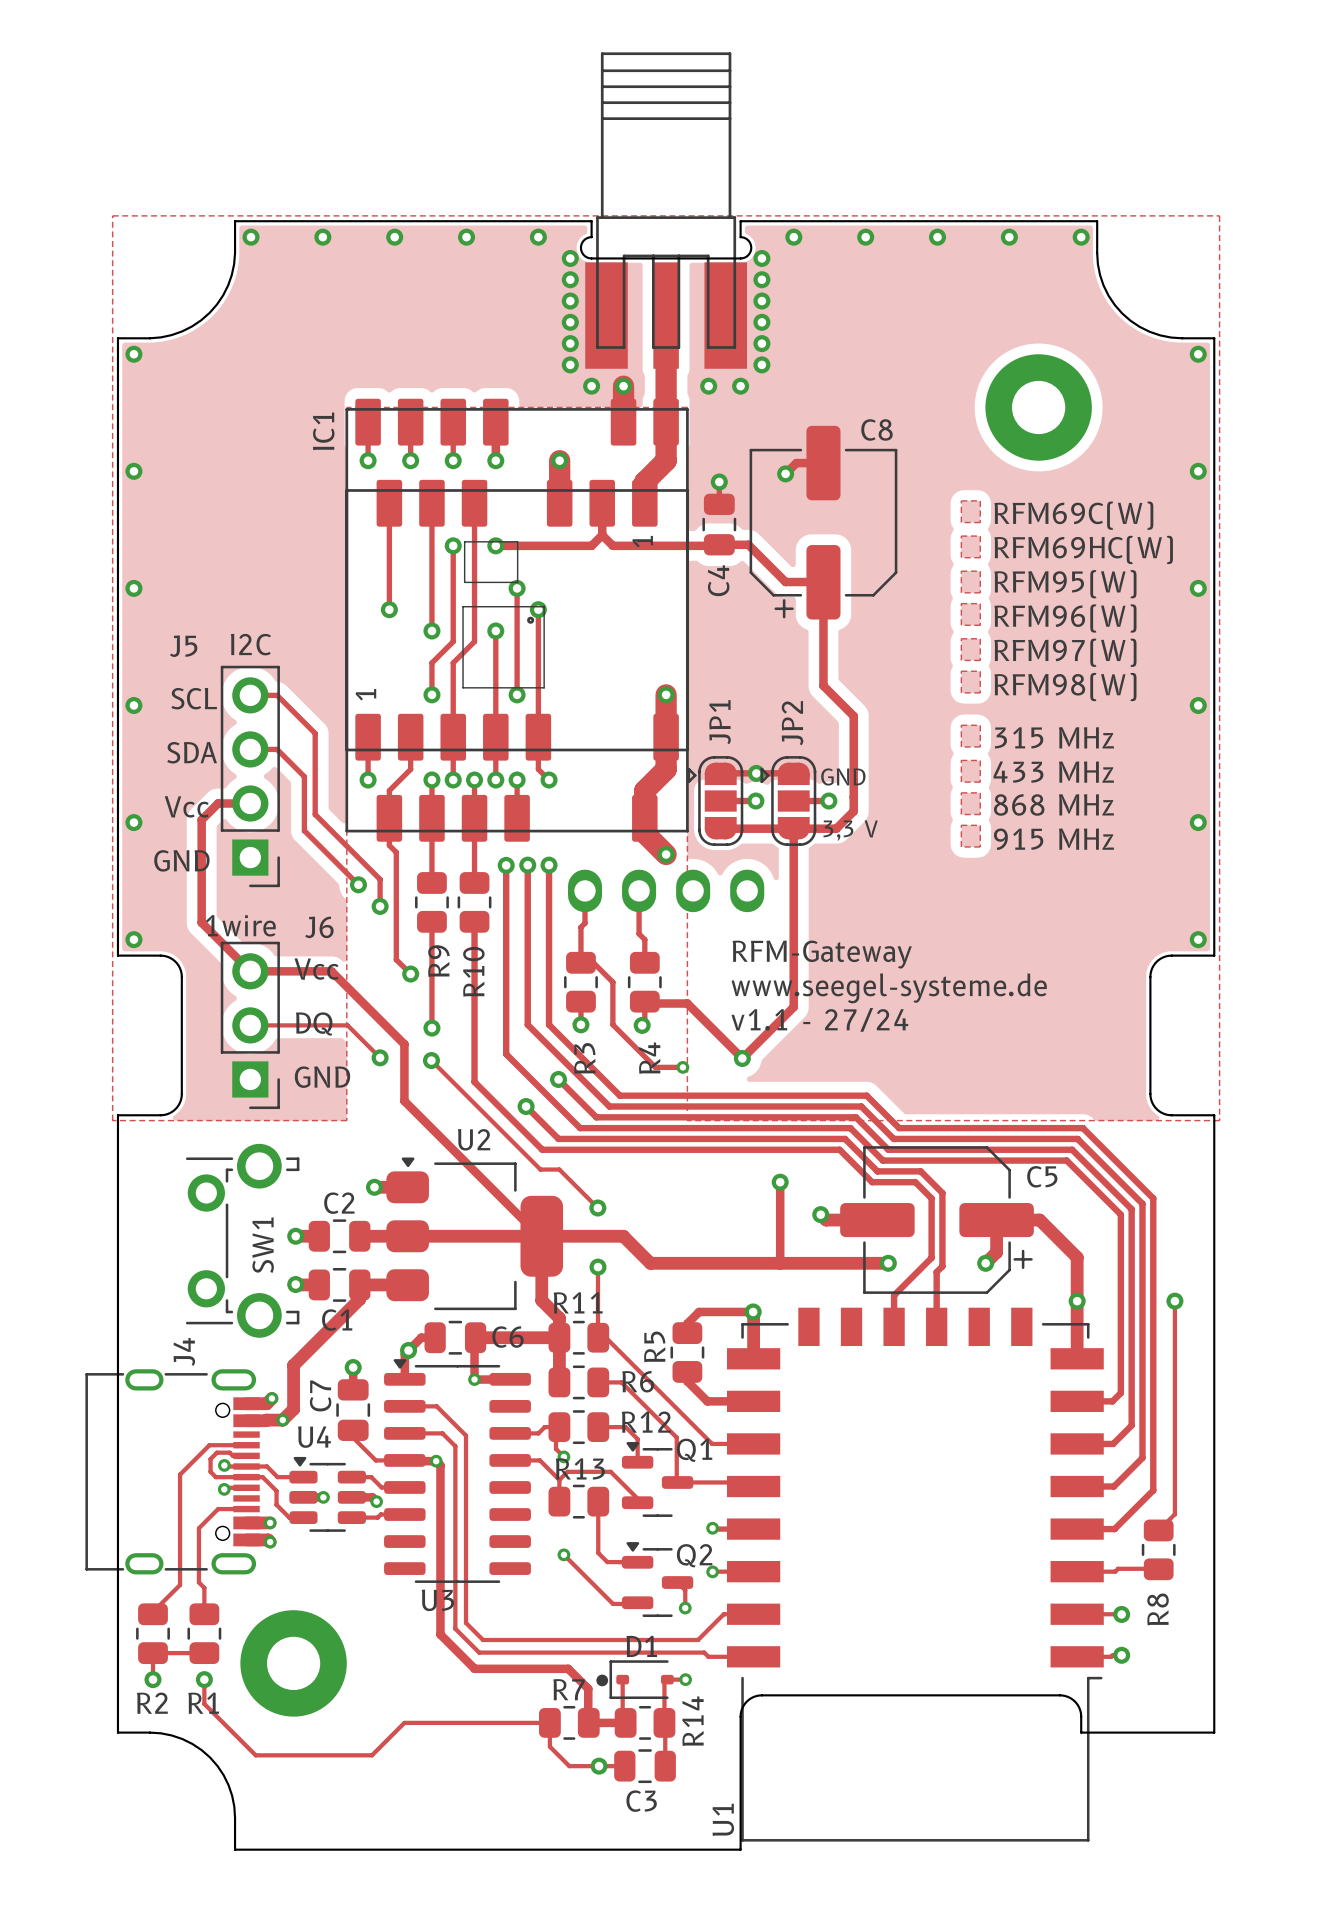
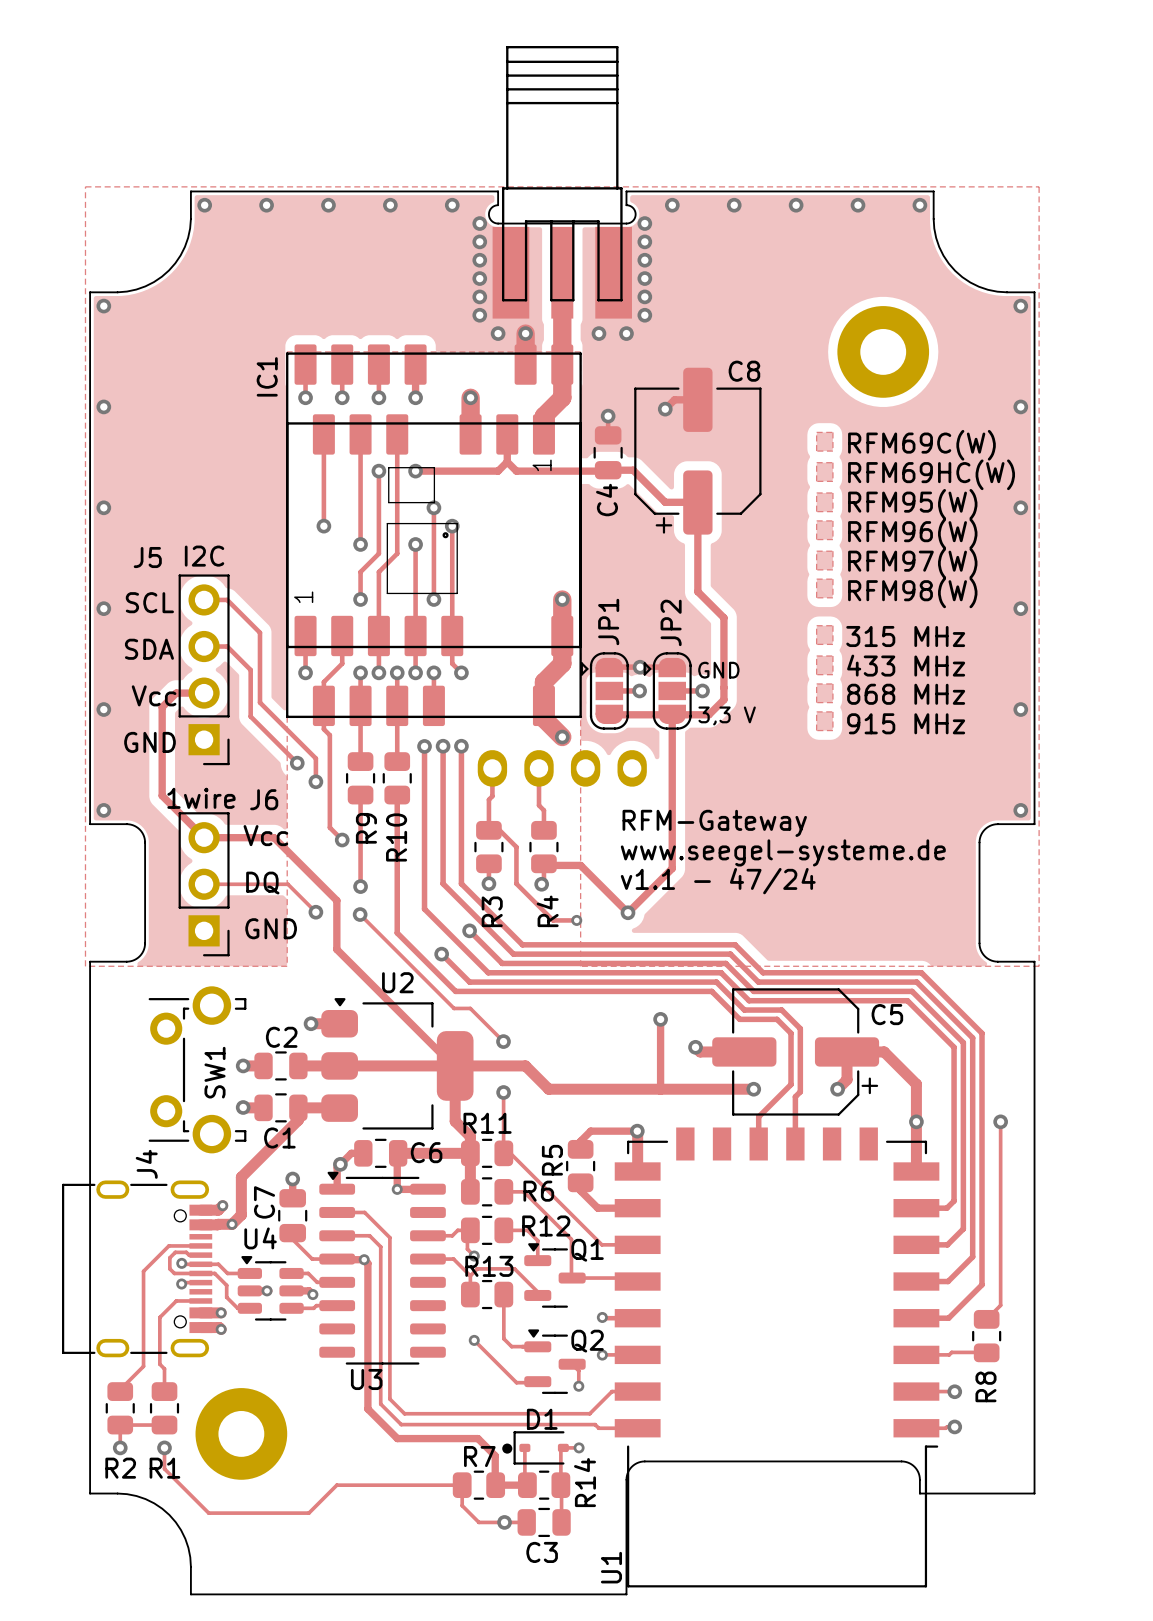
text: v1.1 - 27/24 (819, 1019) -> v1.1 - 47/24 (718, 881)

